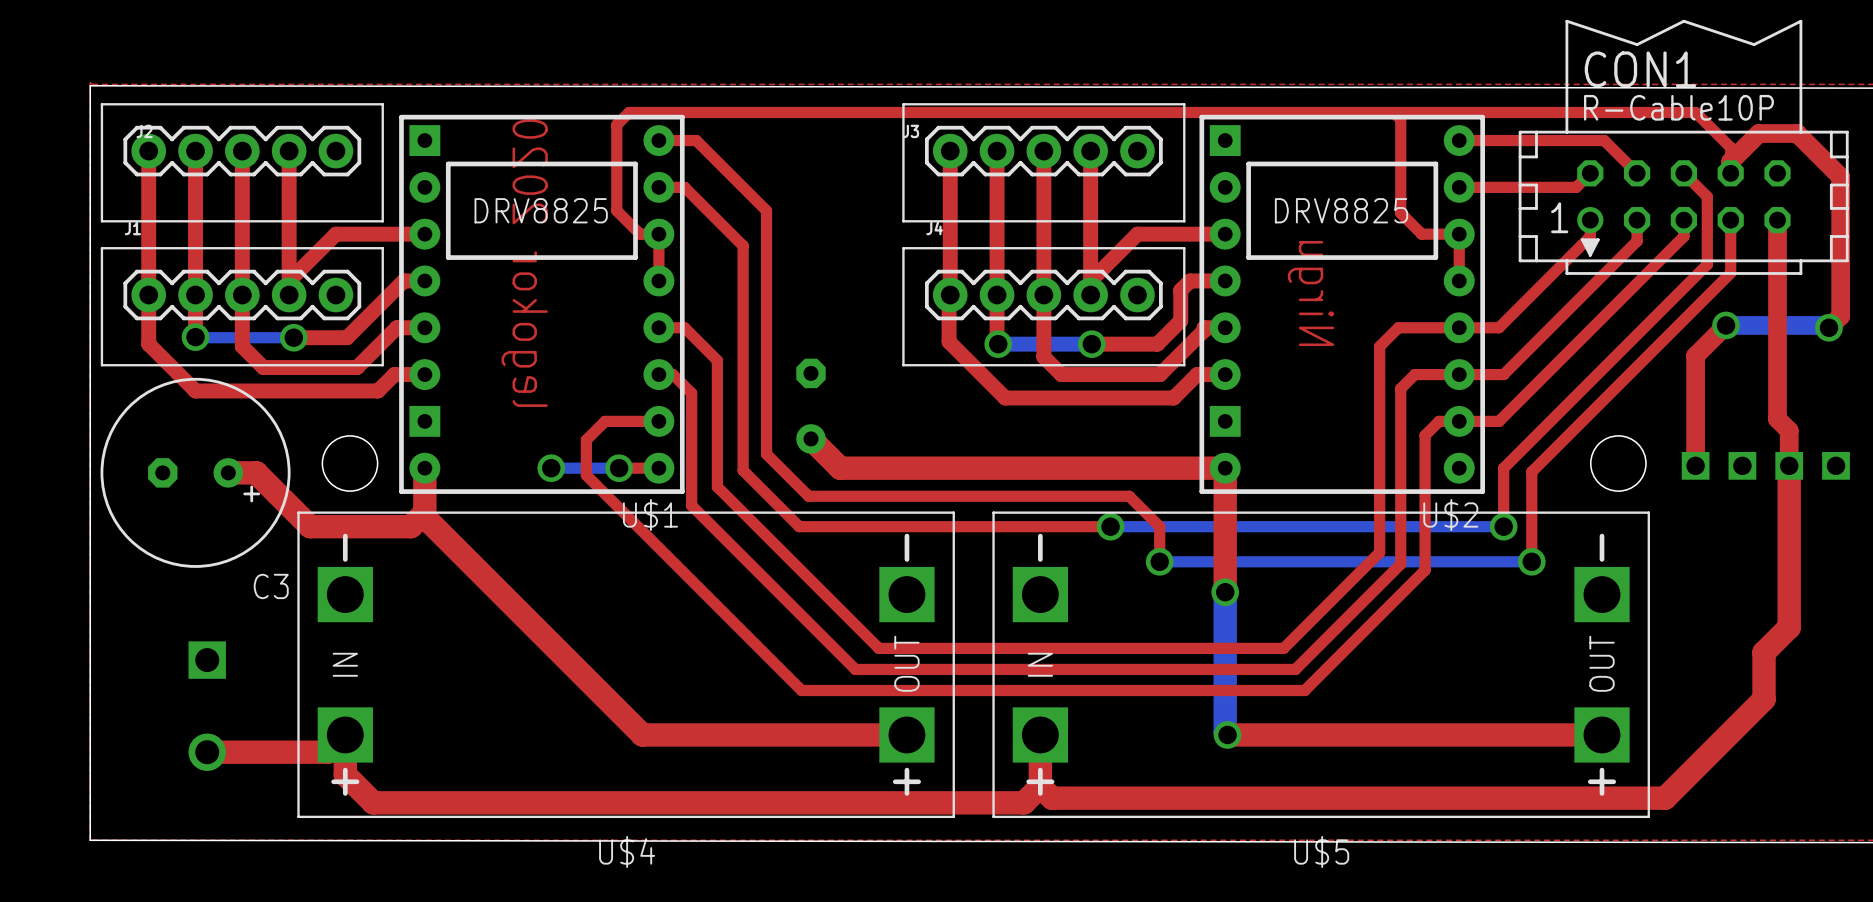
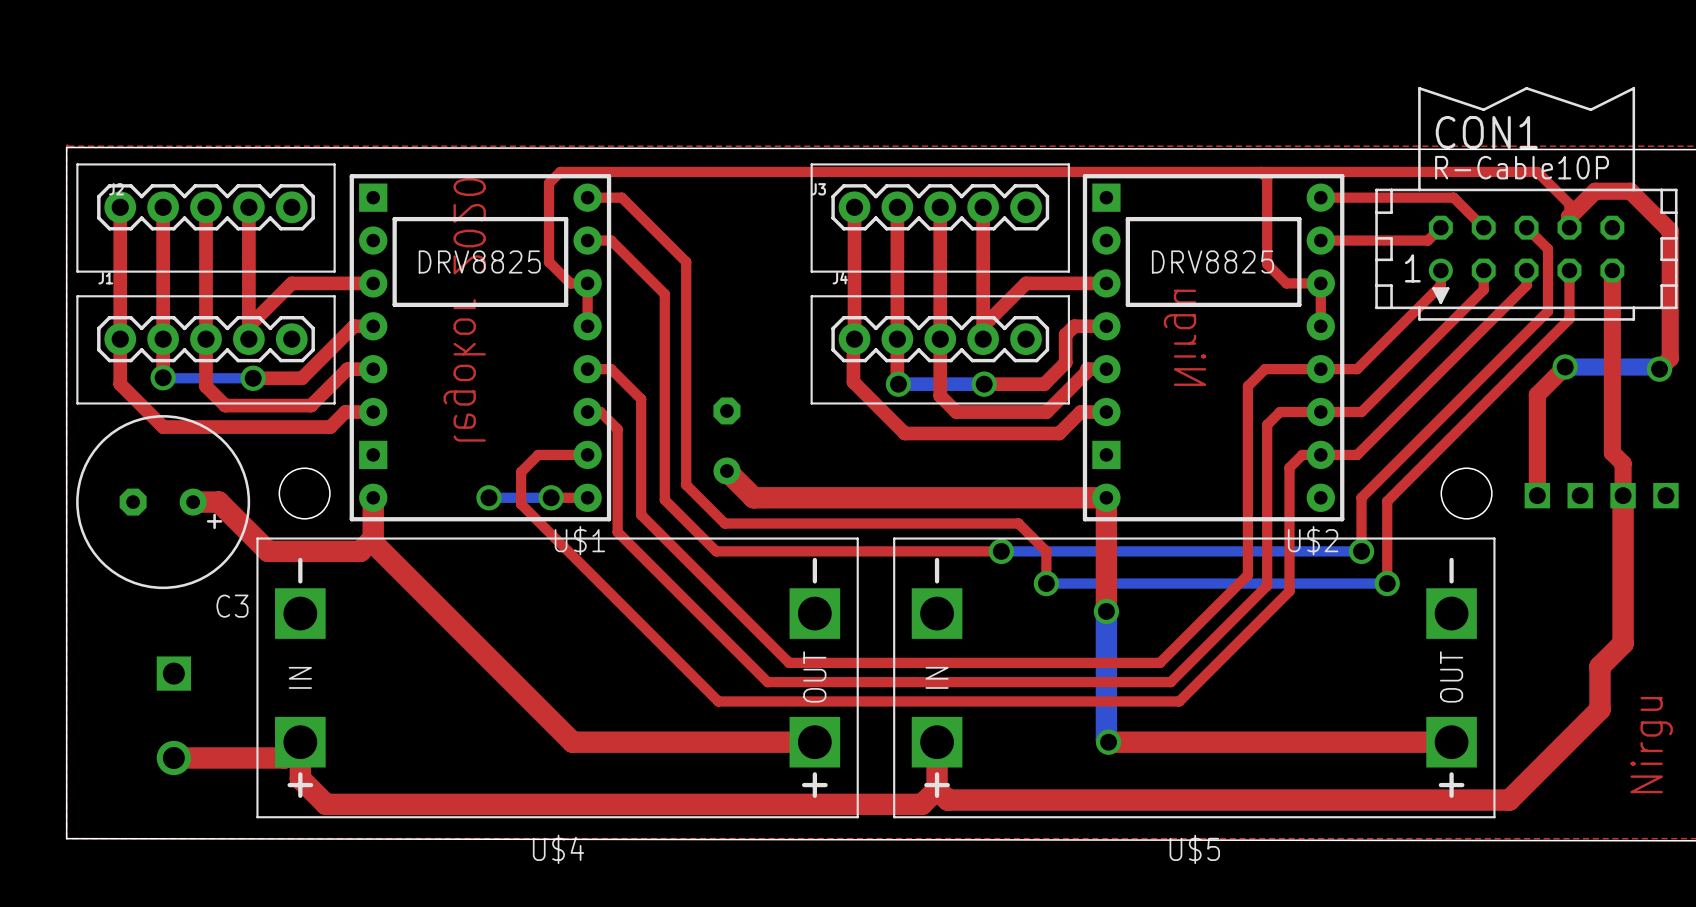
text: none -> Nirgu (1651, 745)

